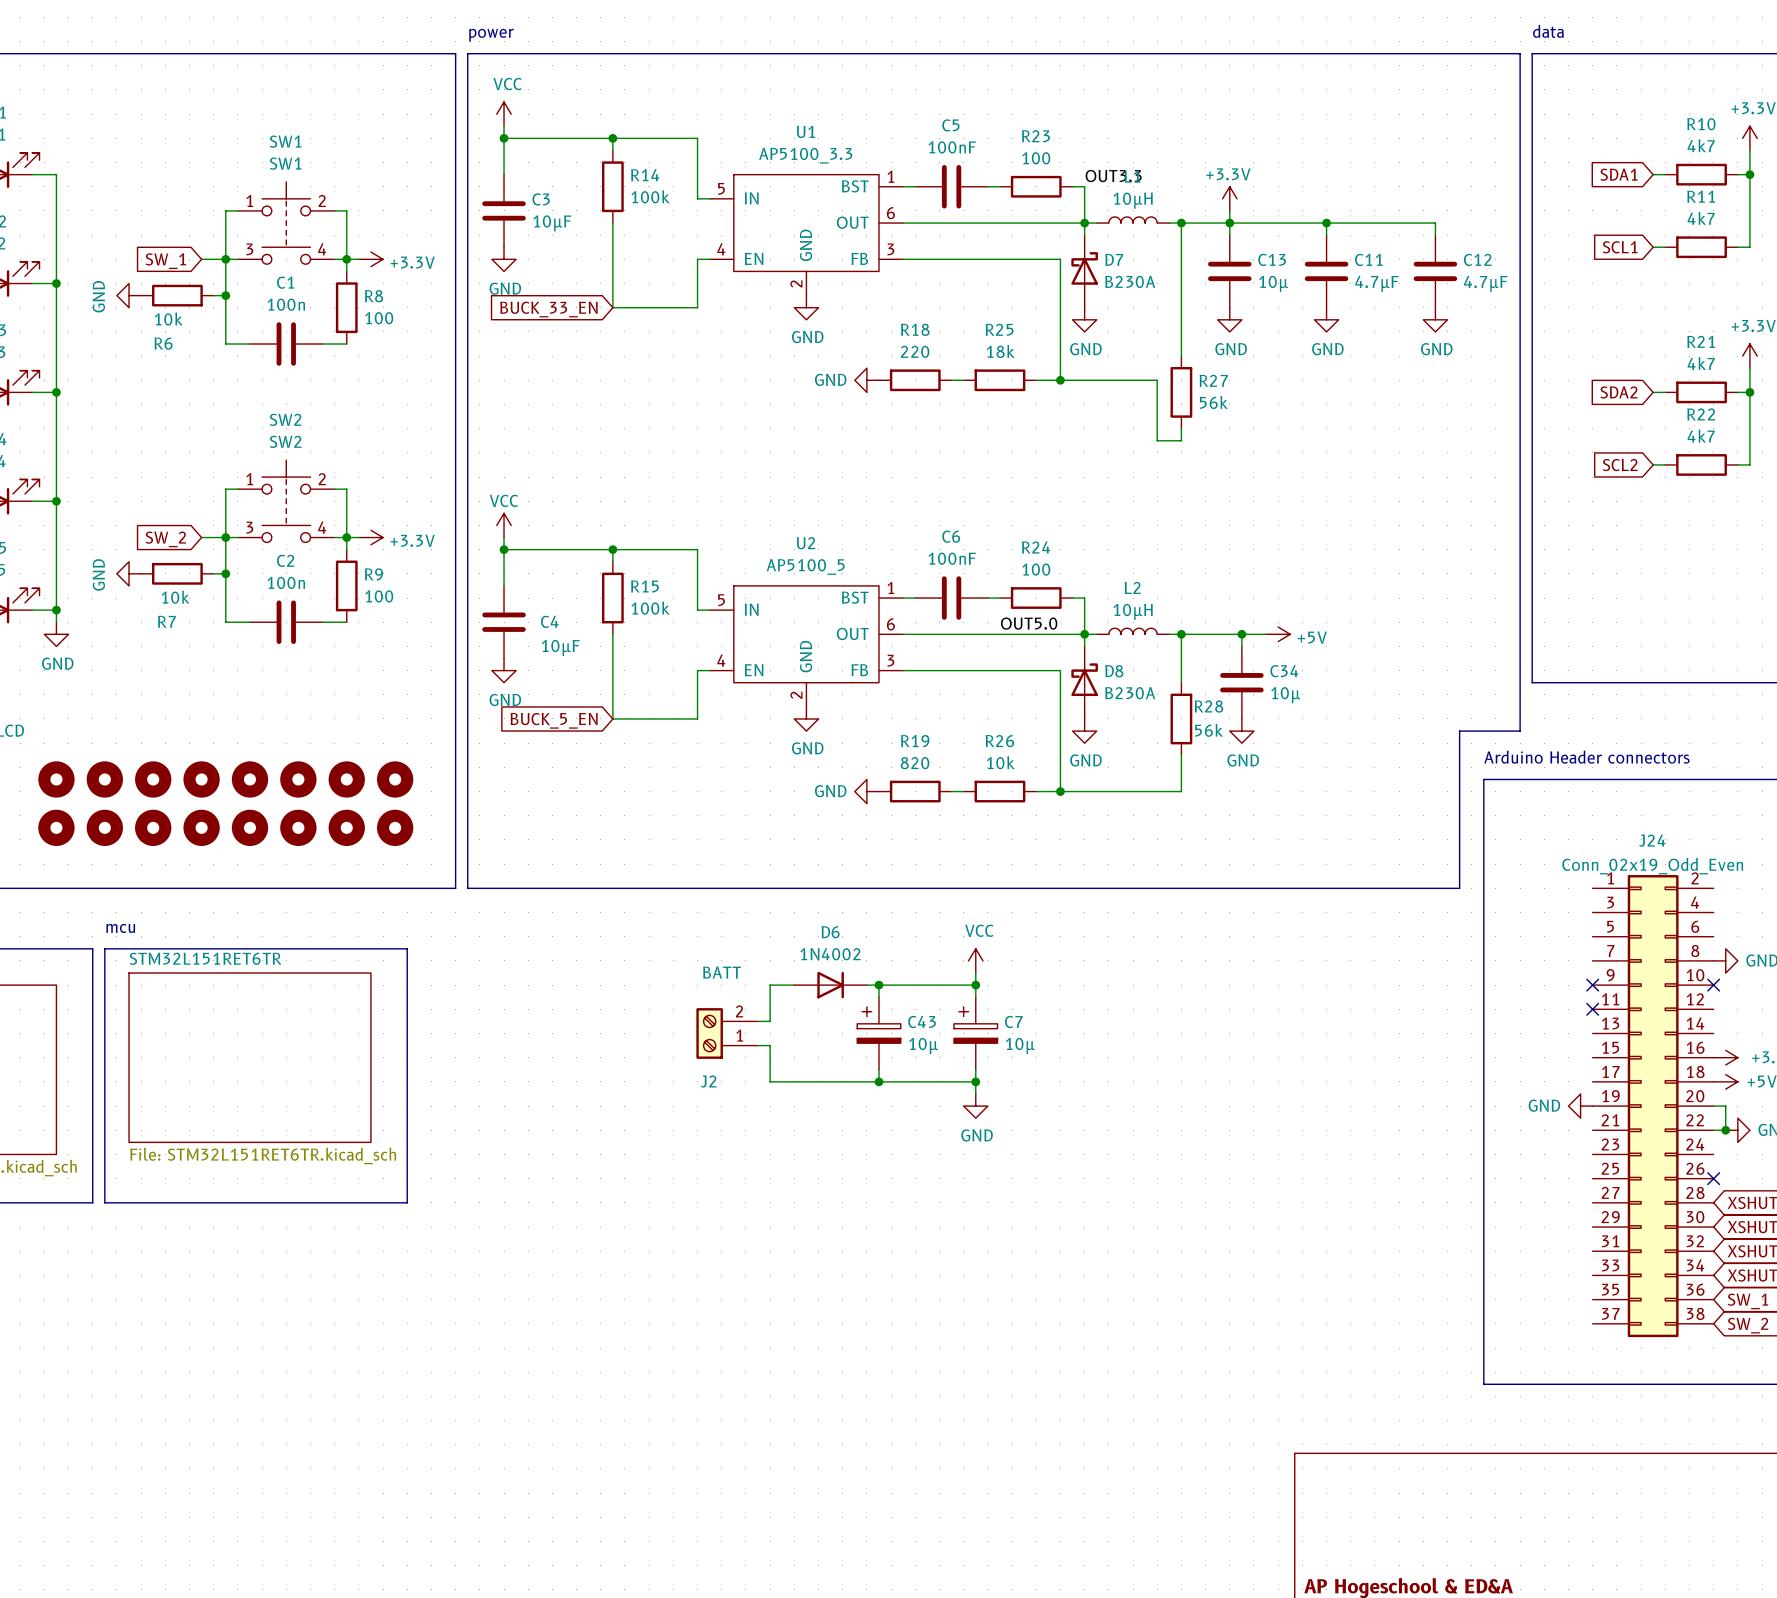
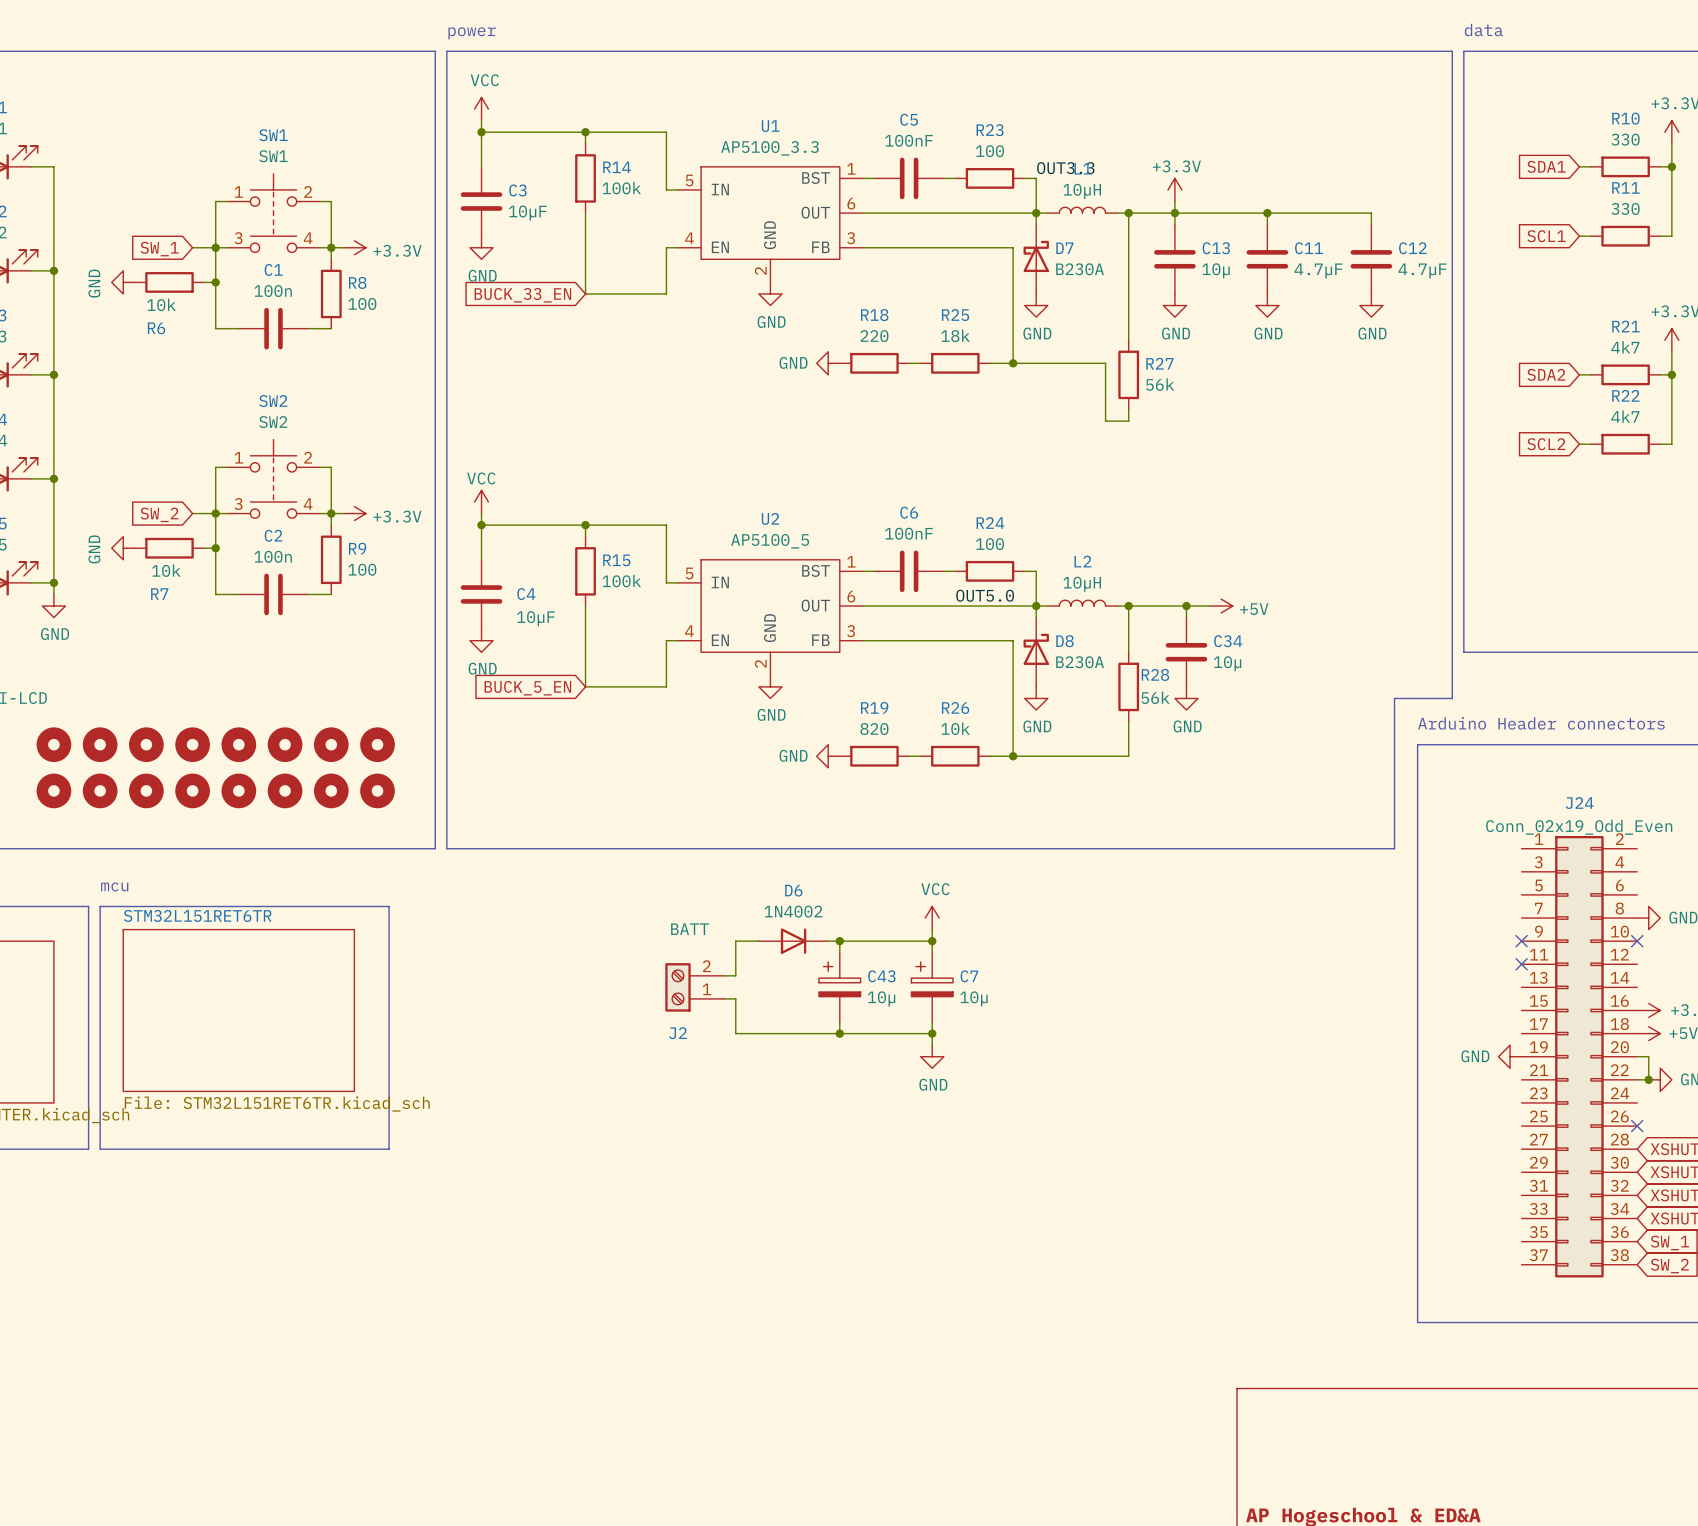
R10 value: 4k7 (1701, 145) -> 330 (1625, 139)
R11 value: 4k7 (1701, 218) -> 330 (1625, 208)

